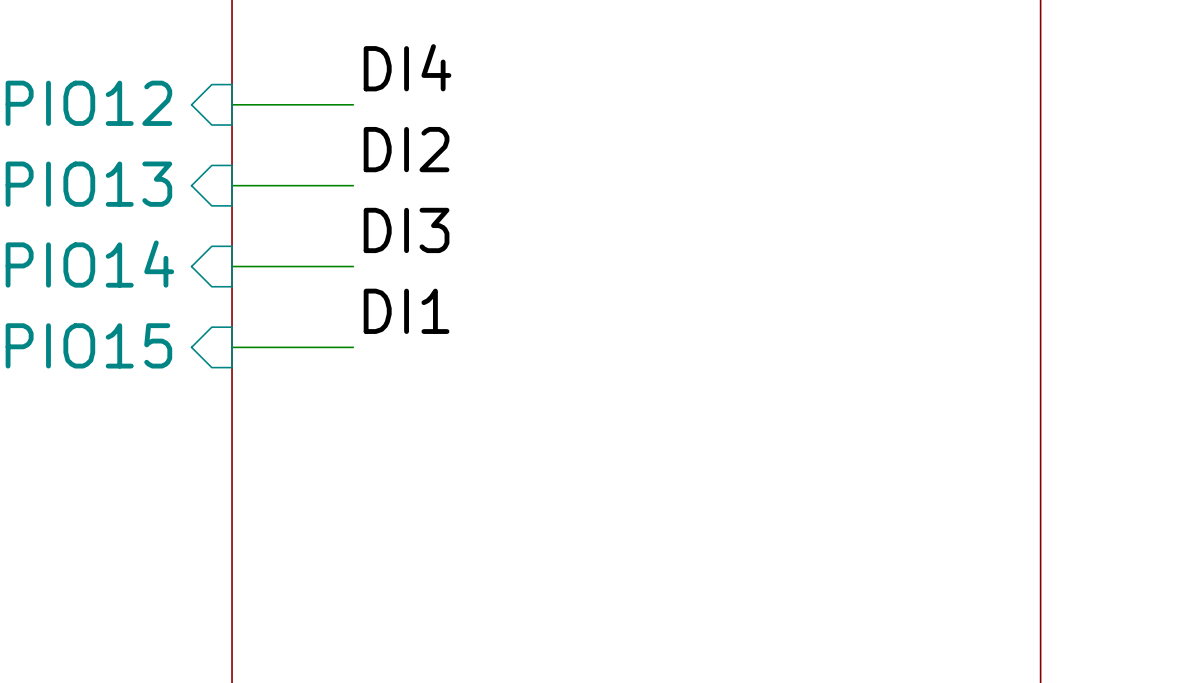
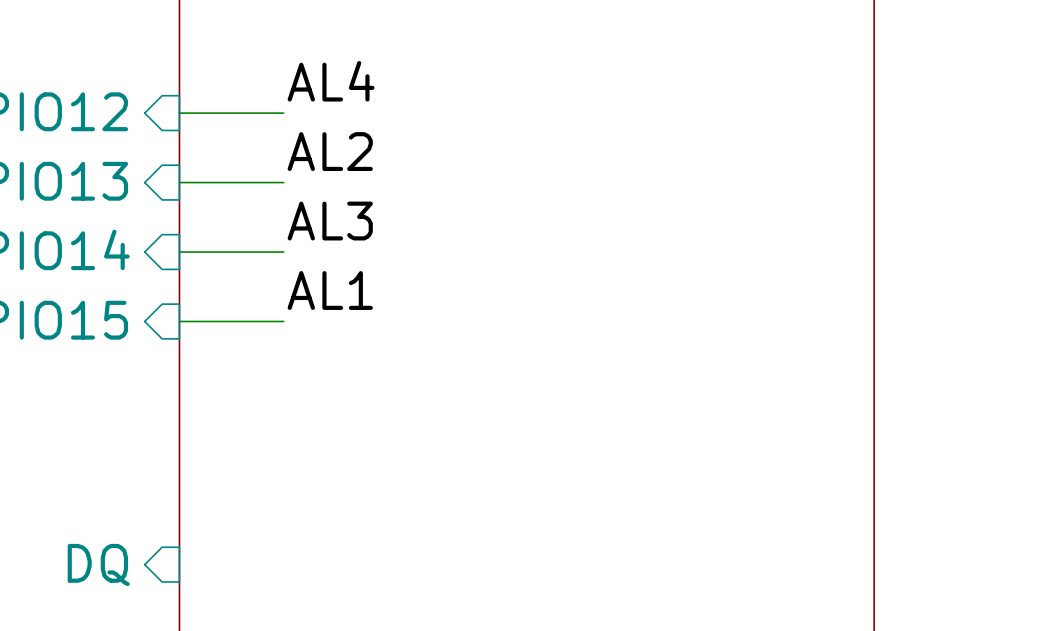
label: DI4 (407, 67) -> AL4 (331, 81)
label: DI2 (406, 149) -> AL2 (330, 151)
label: DI3 (406, 230) -> AL3 (330, 221)
label: DI1 (406, 311) -> AL1 (330, 290)
sheet pin: none -> DQ (98, 564)

